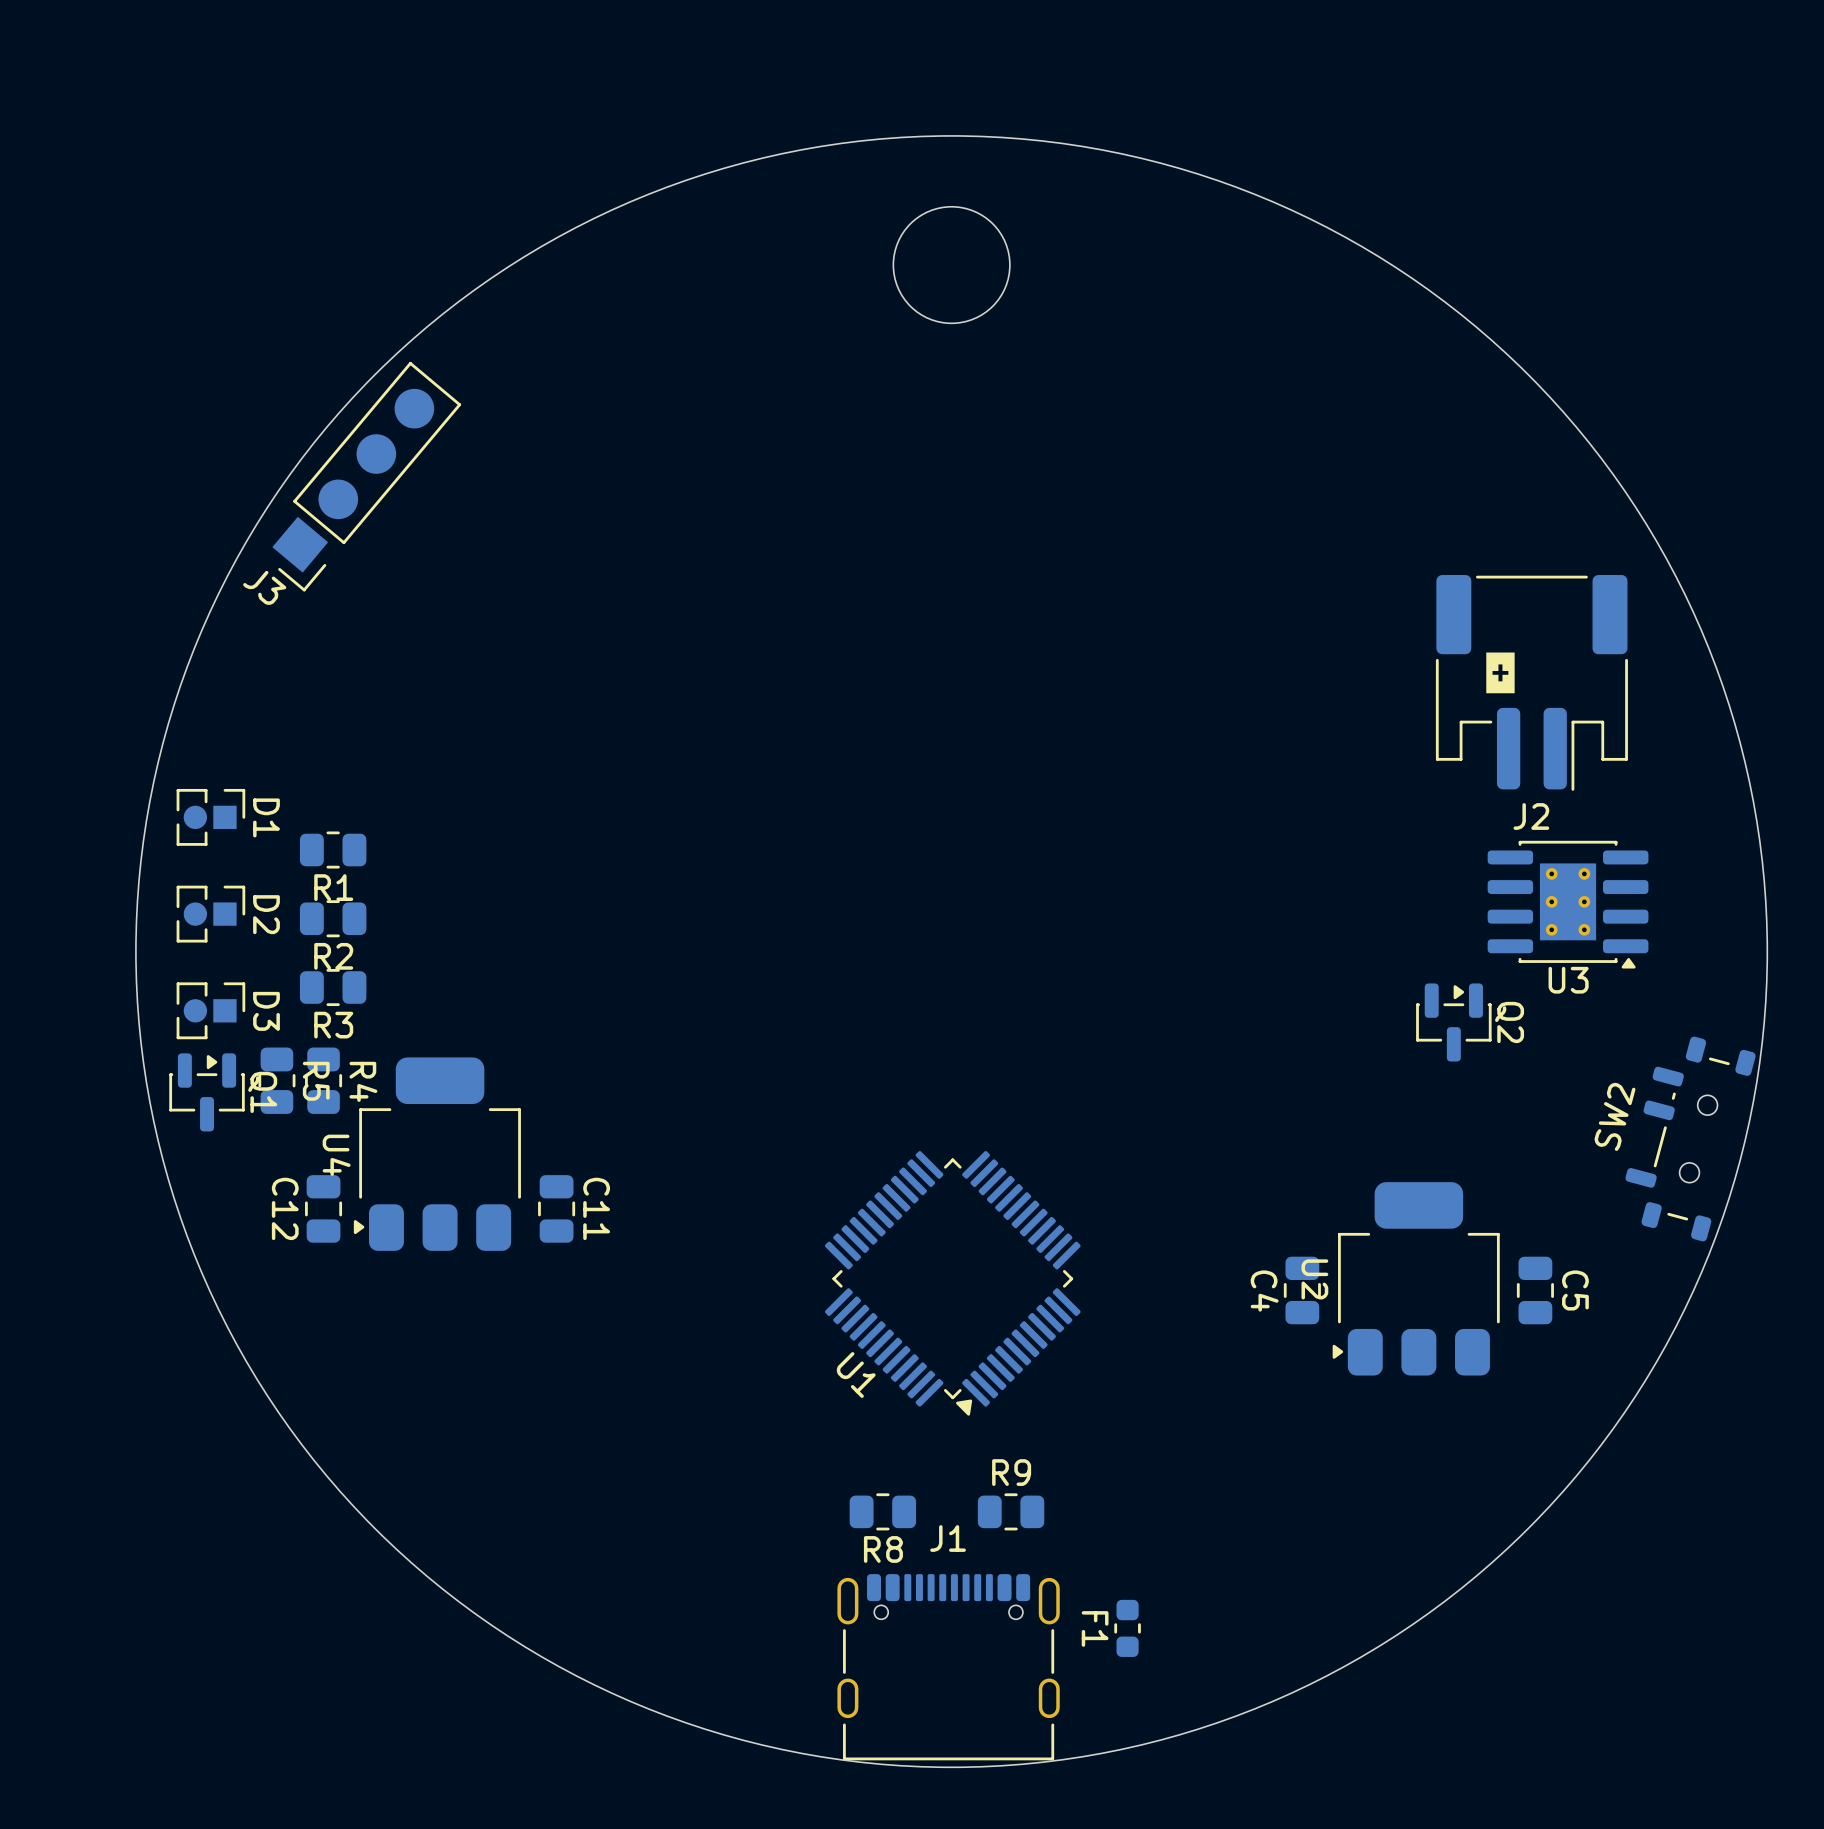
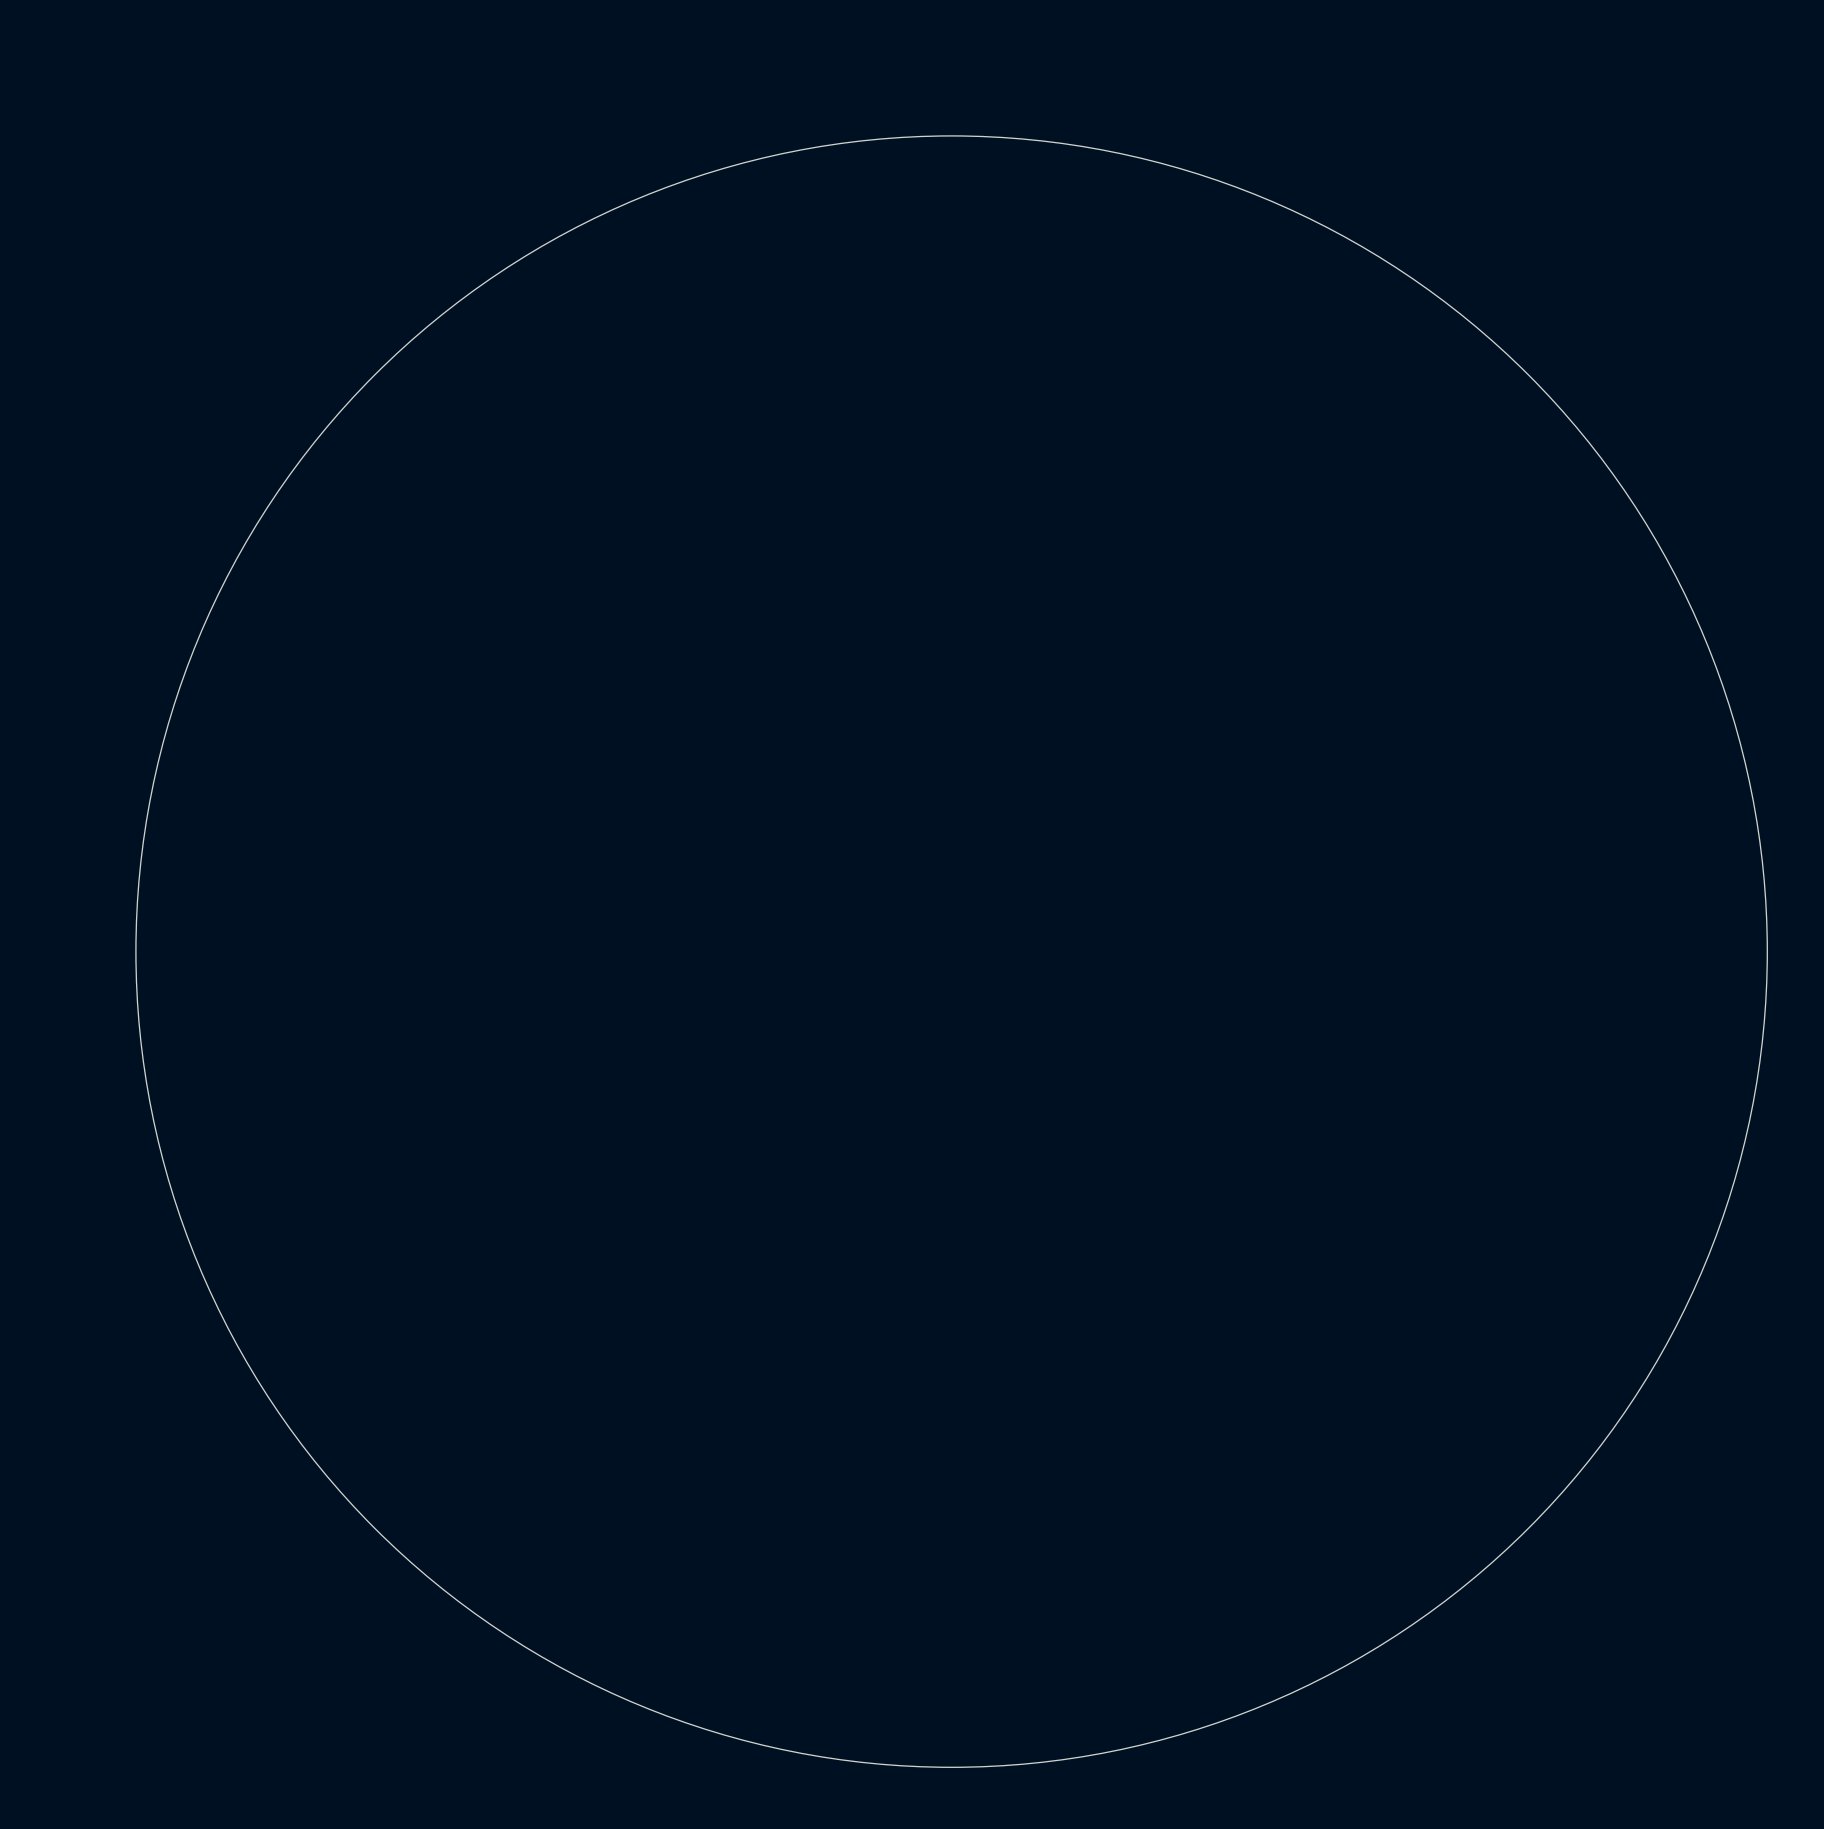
round board edge: [892, 206, 1011, 324] -> none
J3: (366, 476) -> none
drawing: [1486, 652, 1515, 694] -> none
J2: (1531, 682) -> none
D1: (210, 817) -> none
R1: (333, 850) -> none
U3: (1568, 904) -> none
D2: (210, 914) -> none
R2: (333, 918) -> none
R3: (333, 987) -> none
D3: (210, 1010) -> none
Q2: (1453, 1022) -> none
R5: (276, 1080) -> none
R4: (323, 1080) -> none
Q1: (207, 1092) -> none
SW2: (1690, 1138) -> none
U4: (437, 1154) -> none
C12: (323, 1208) -> none
C11: (556, 1208) -> none
U2: (1416, 1278) -> none
U1: (952, 1283) -> none
C4: (1302, 1290) -> none
C5: (1535, 1290) -> none
R8: (882, 1511) -> none
R9: (1011, 1511) -> none
F1: (1127, 1628) -> none
J1: (948, 1667) -> none

